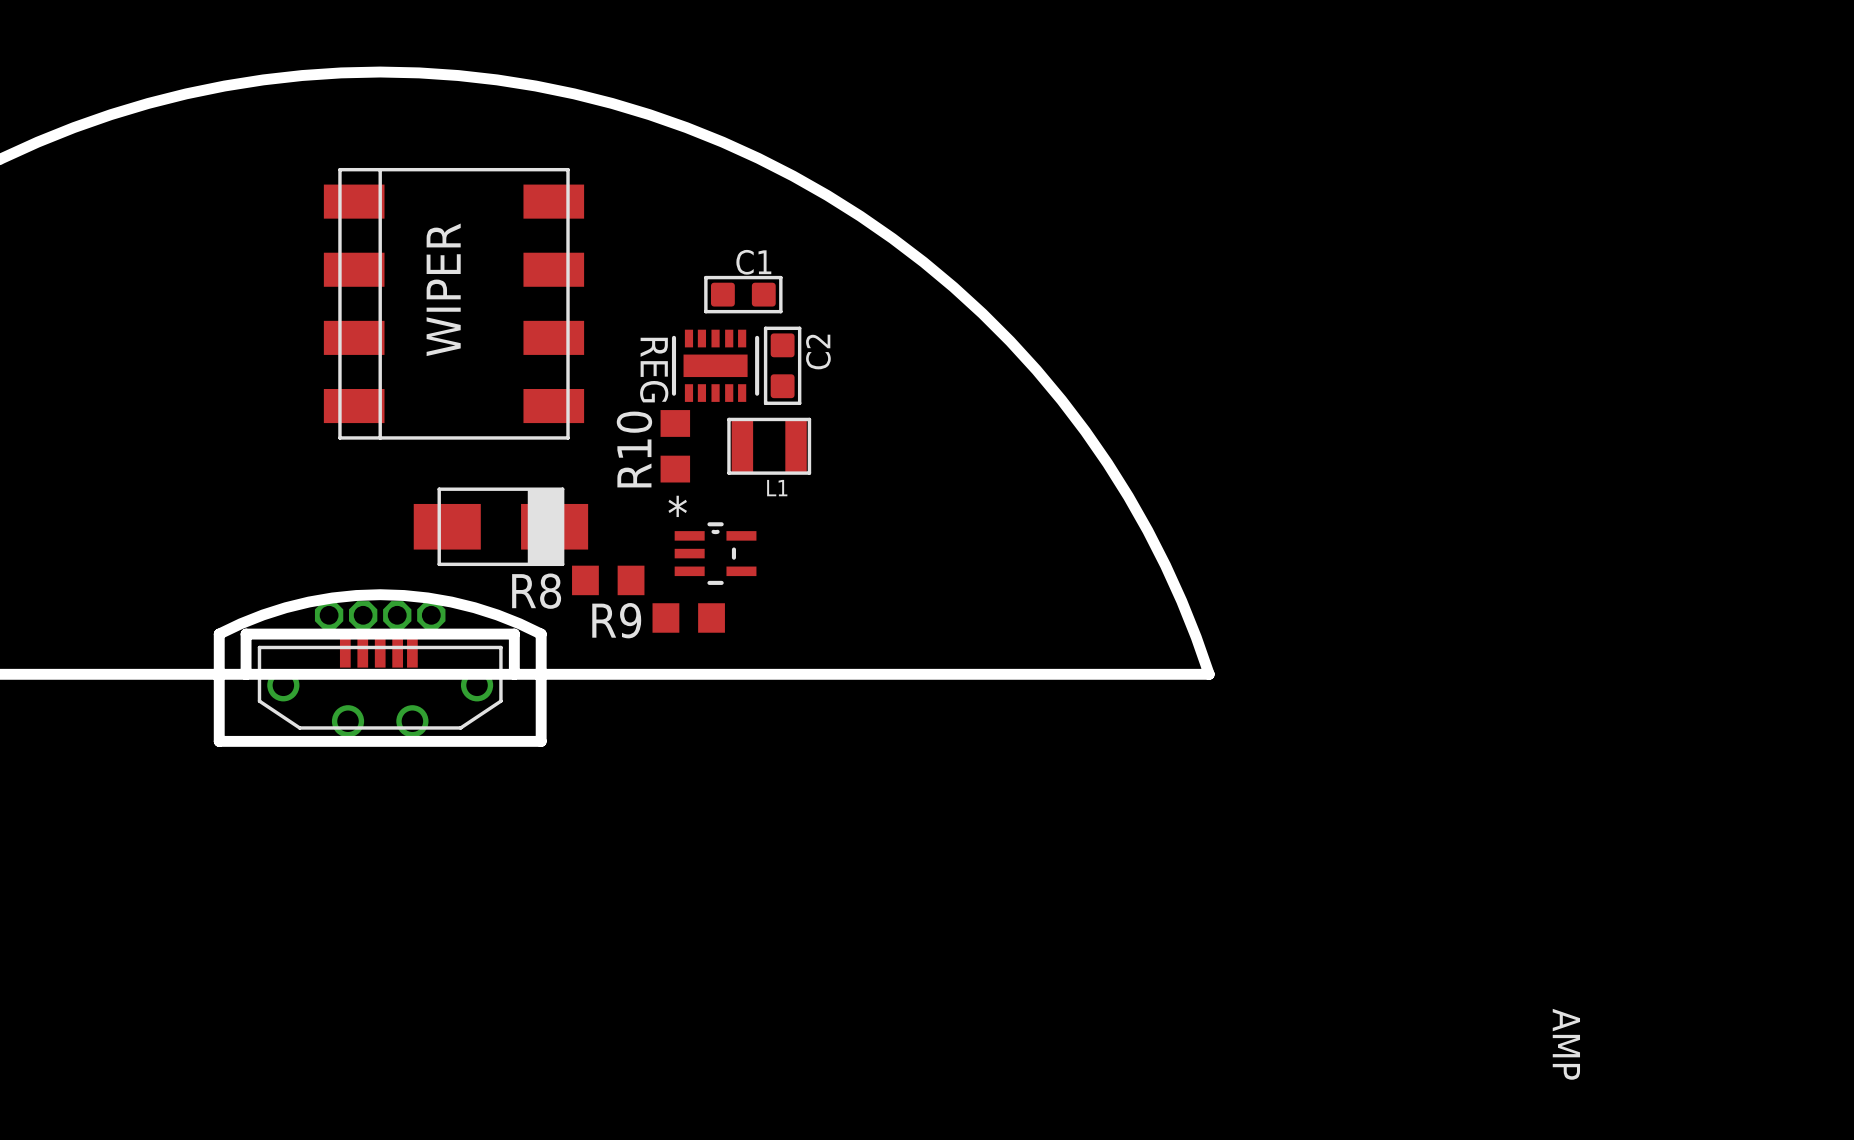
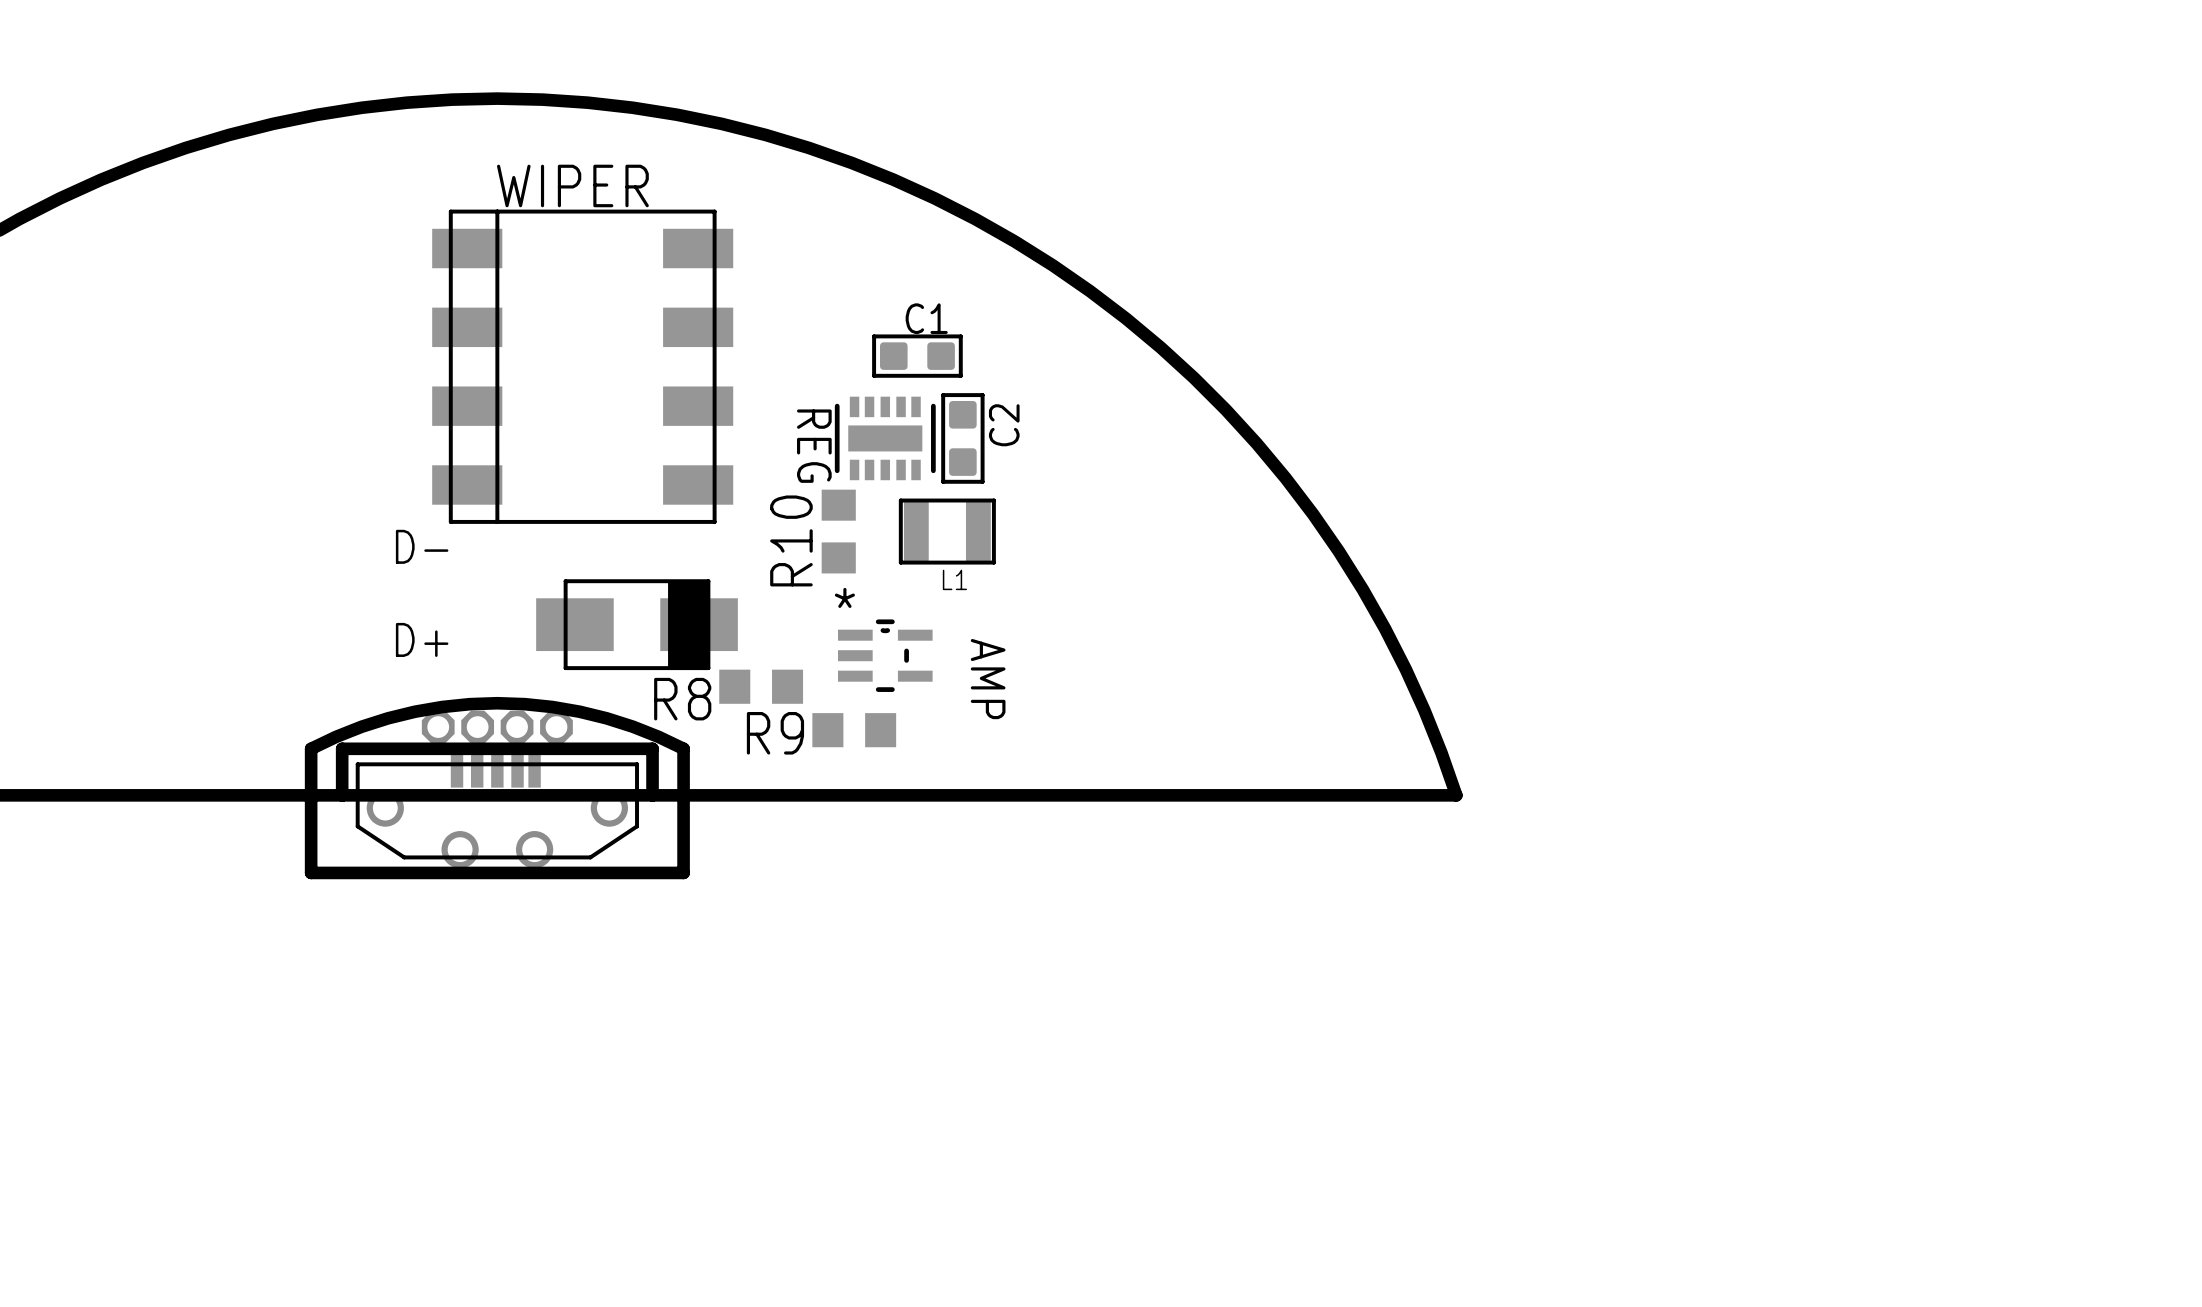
WIPER name rotation: 0° (443, 289) -> 90° clockwise (572, 185)
text: none -> D- (422, 546)
text: none -> D+ (422, 639)
AMP name position: AMP (1566, 1044) -> AMP (988, 679)

